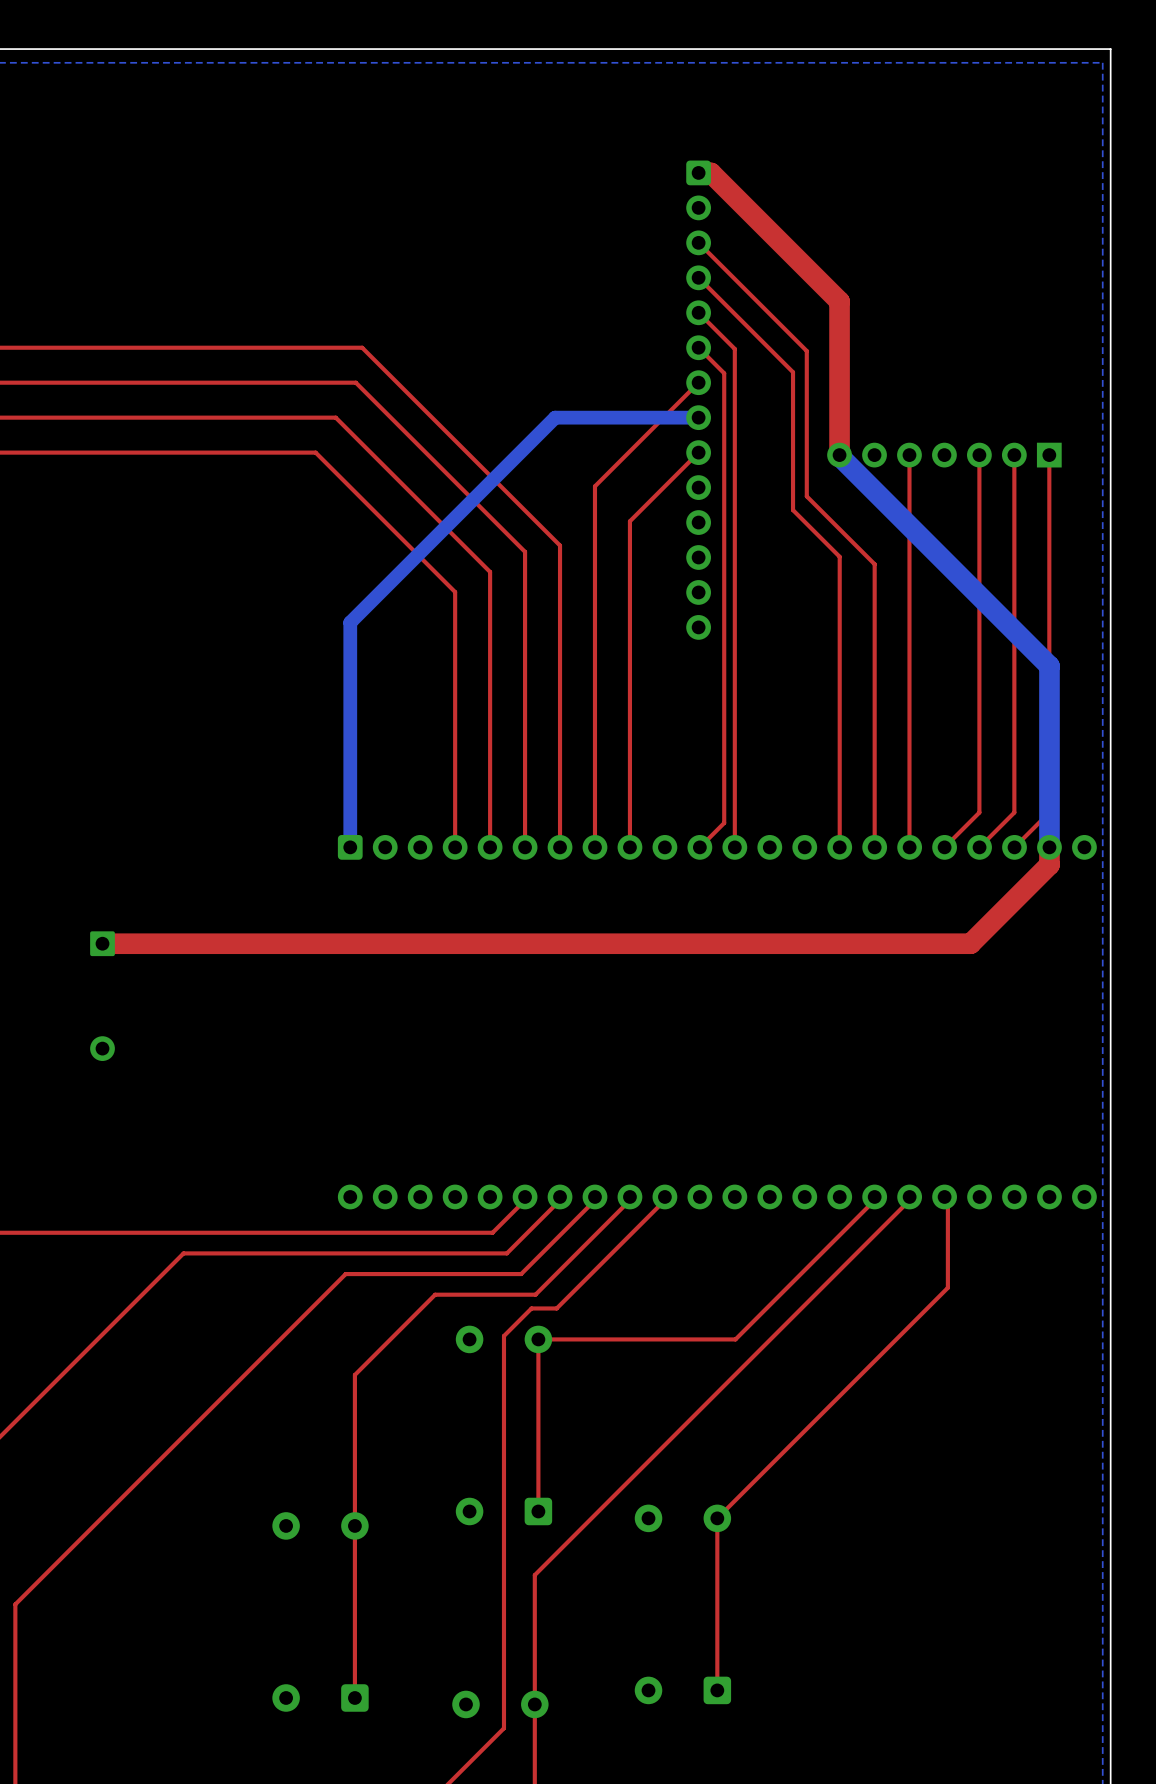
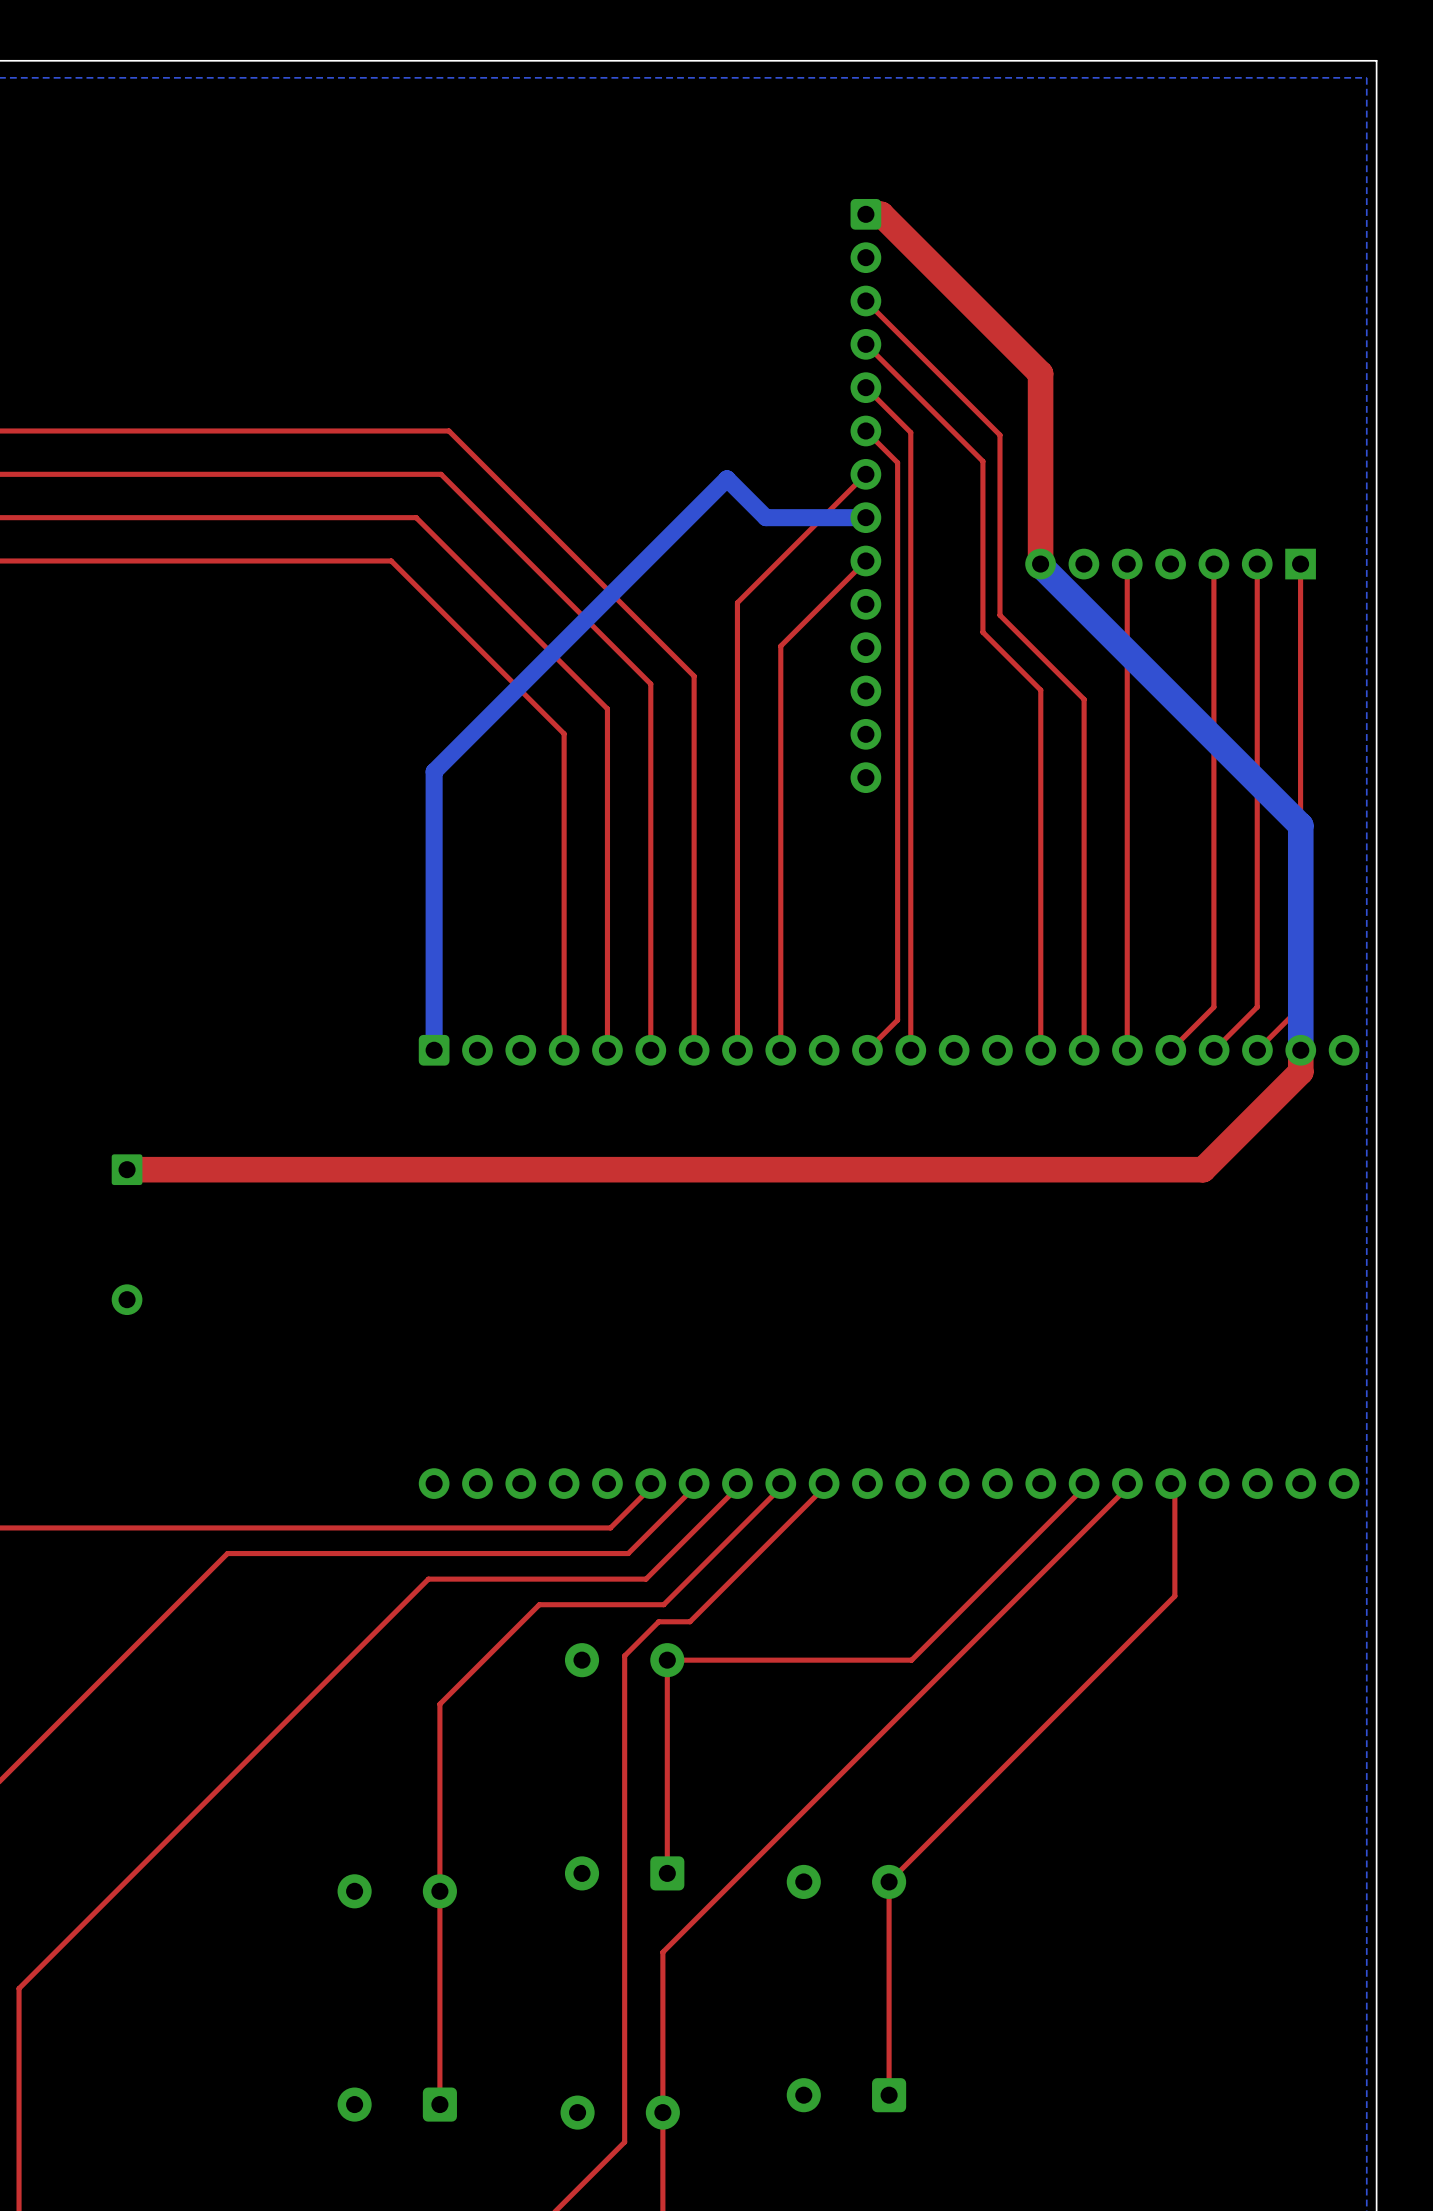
bottom track: (617, 417) (555, 417) -> (765, 517) (727, 478) (688, 517)

